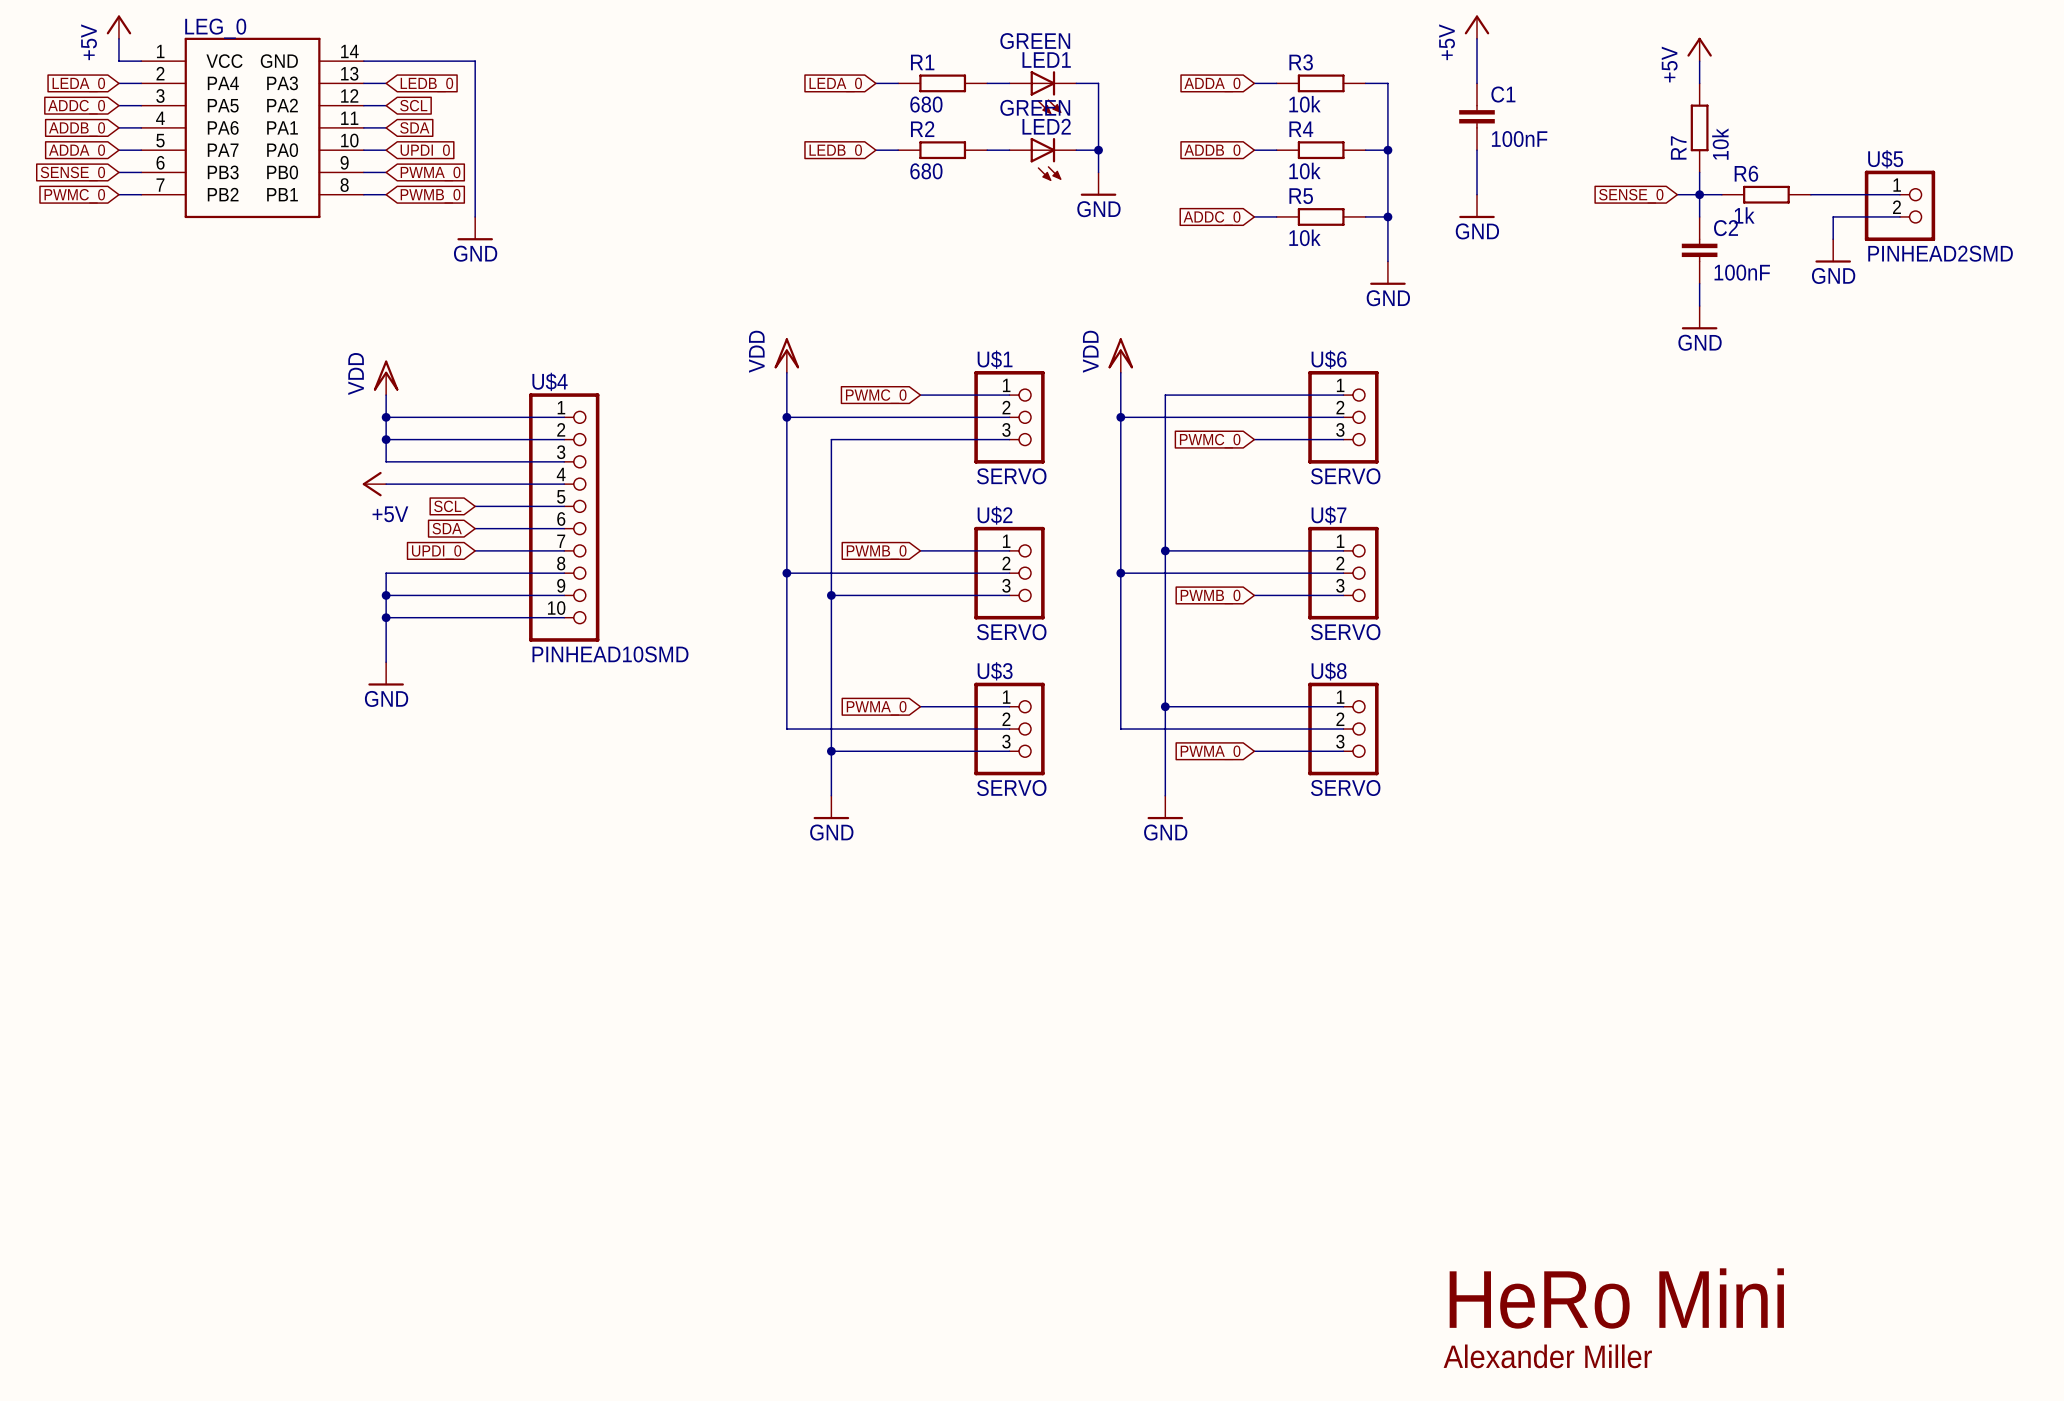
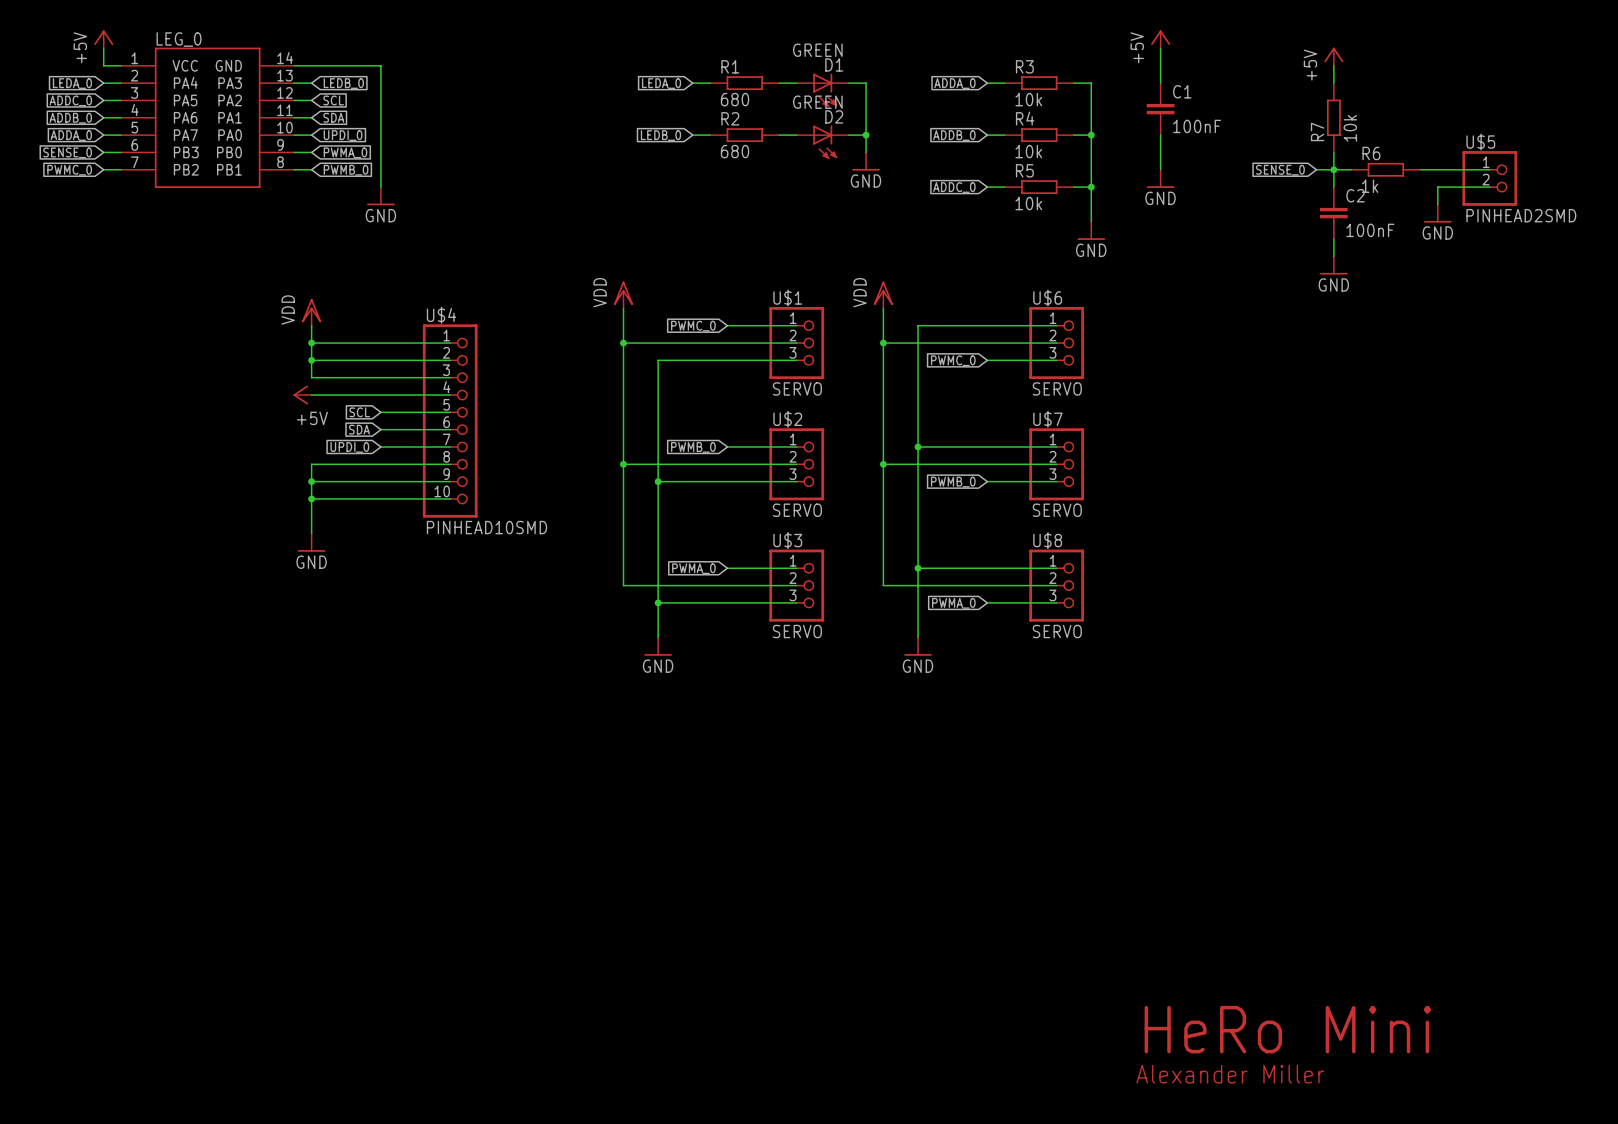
LED1 name: LED1 (1046, 60) -> D1 (834, 64)
LED2 name: LED2 (1046, 126) -> D2 (834, 116)

